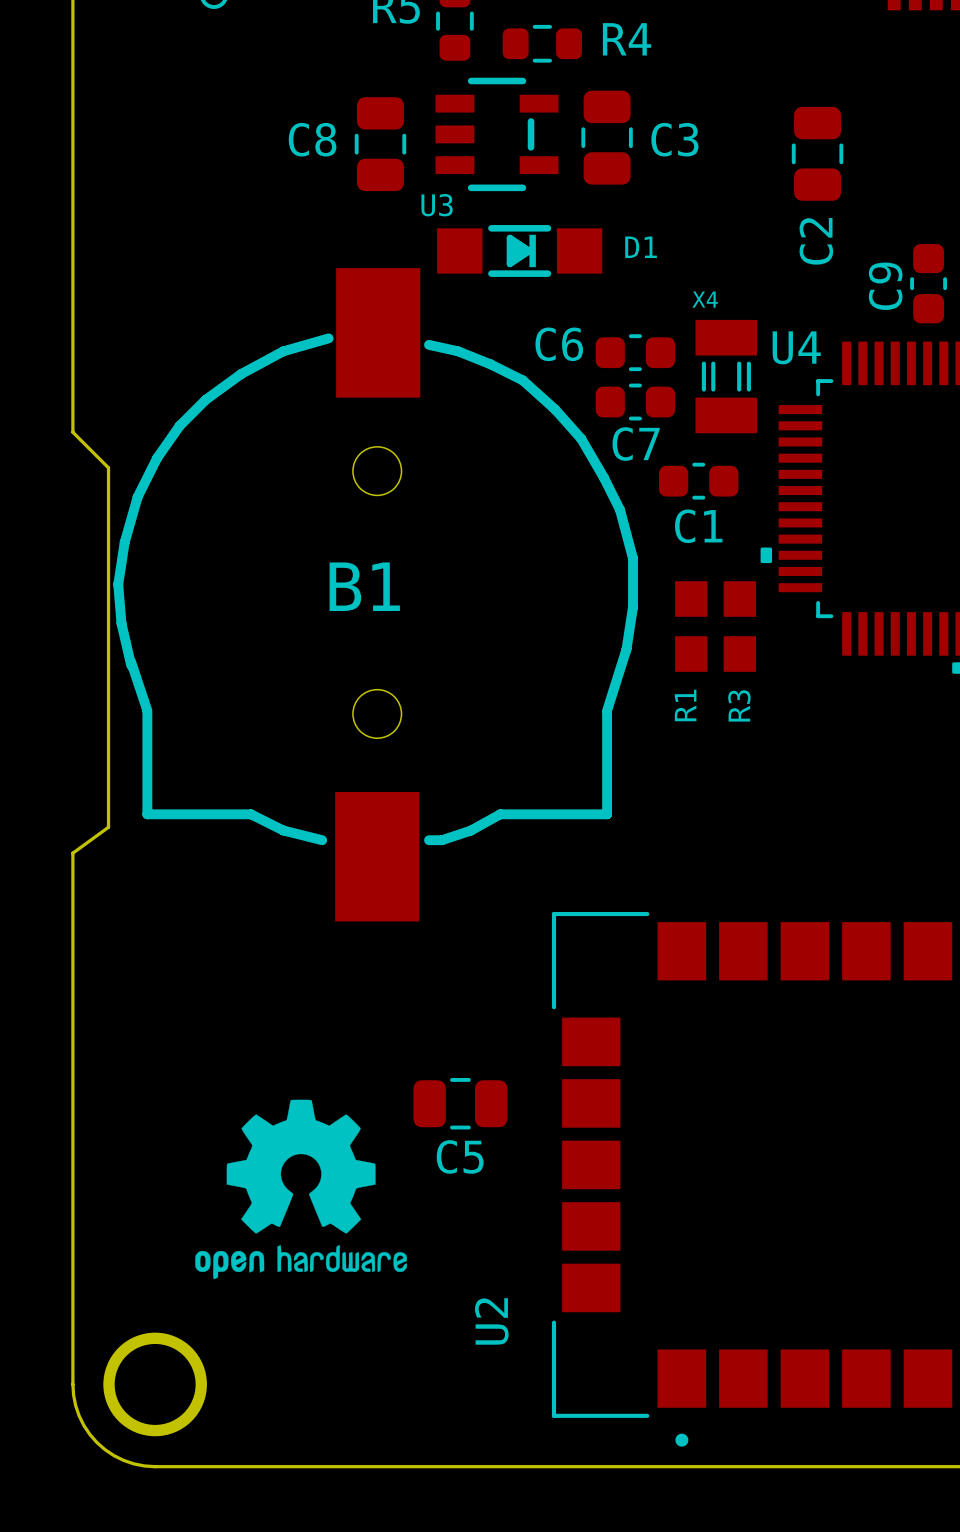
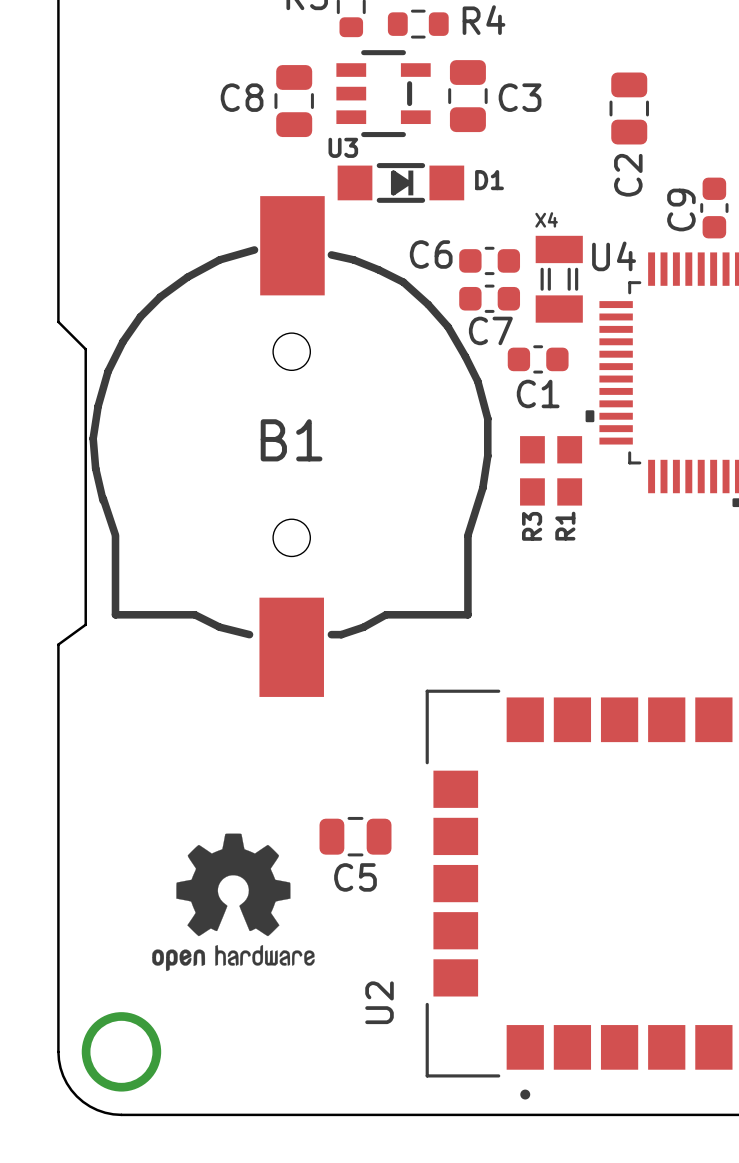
R1 name: R1 (685, 705) -> R3 (532, 526)
R3 name: R3 (739, 705) -> R1 (565, 526)

